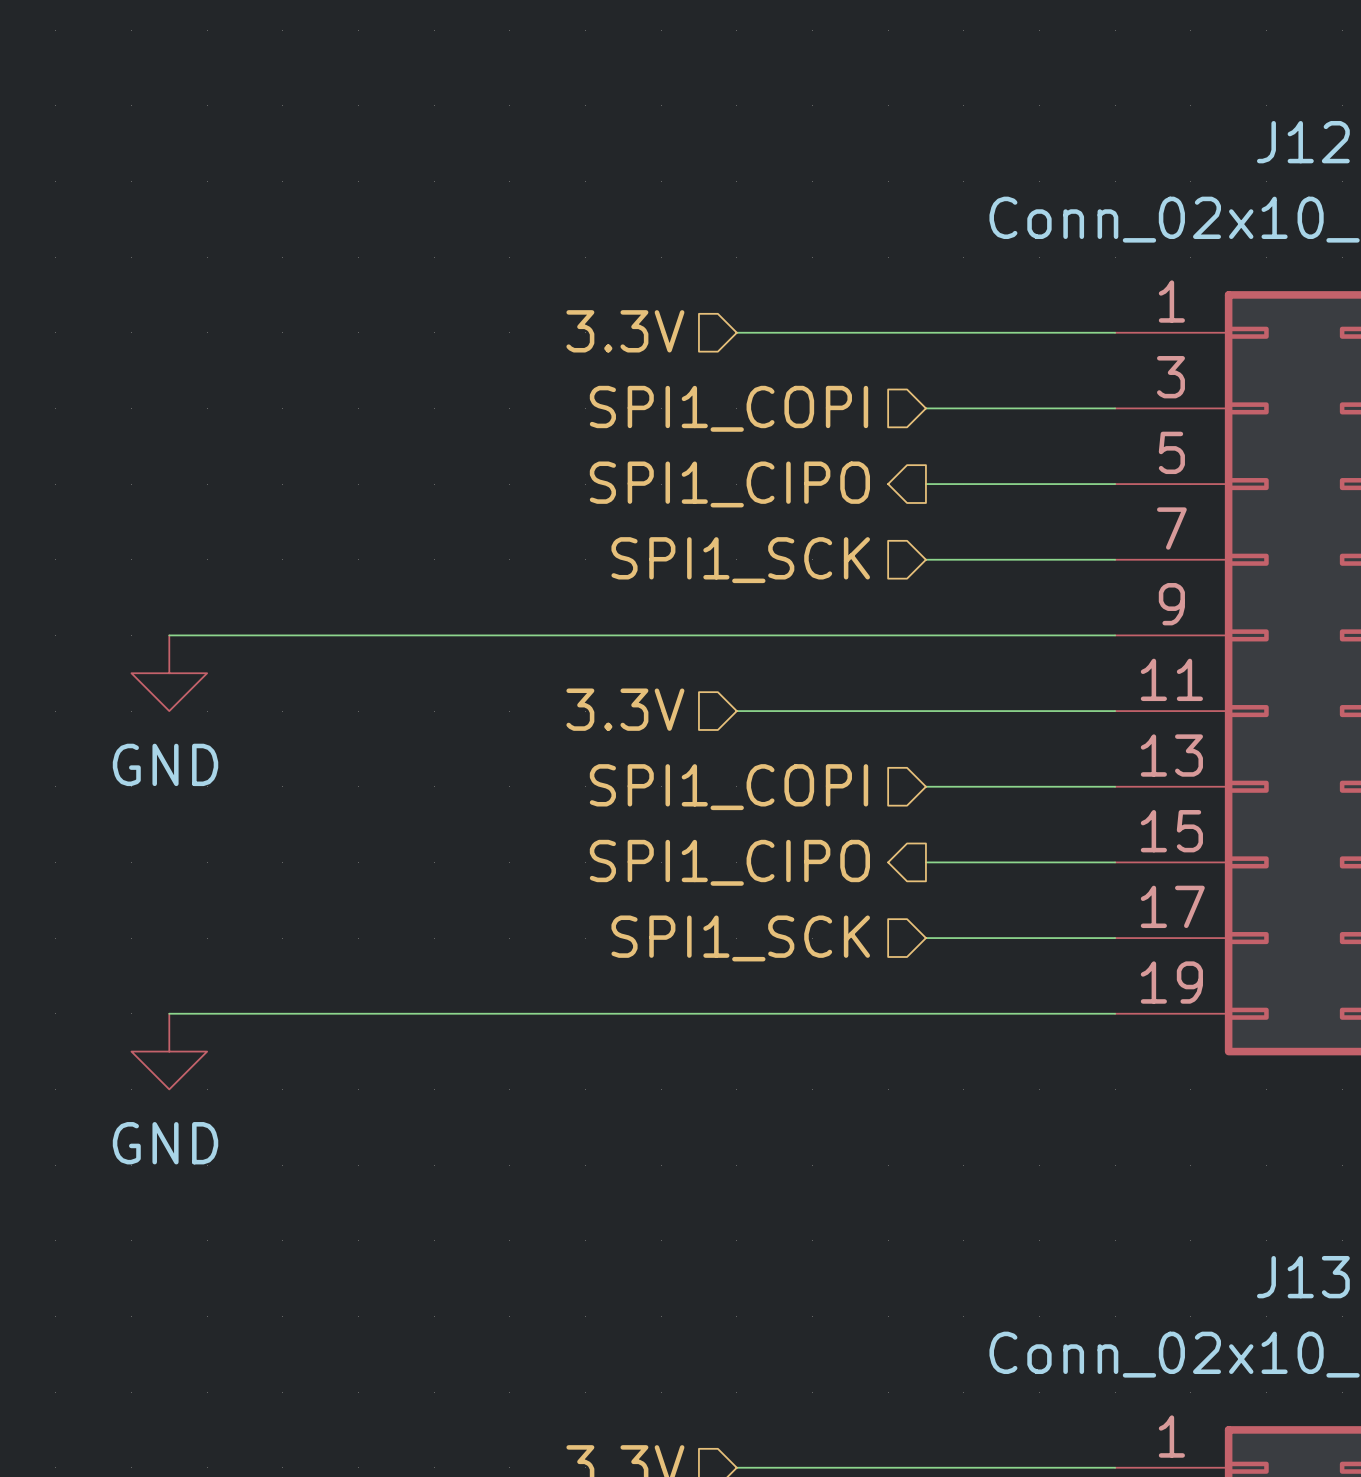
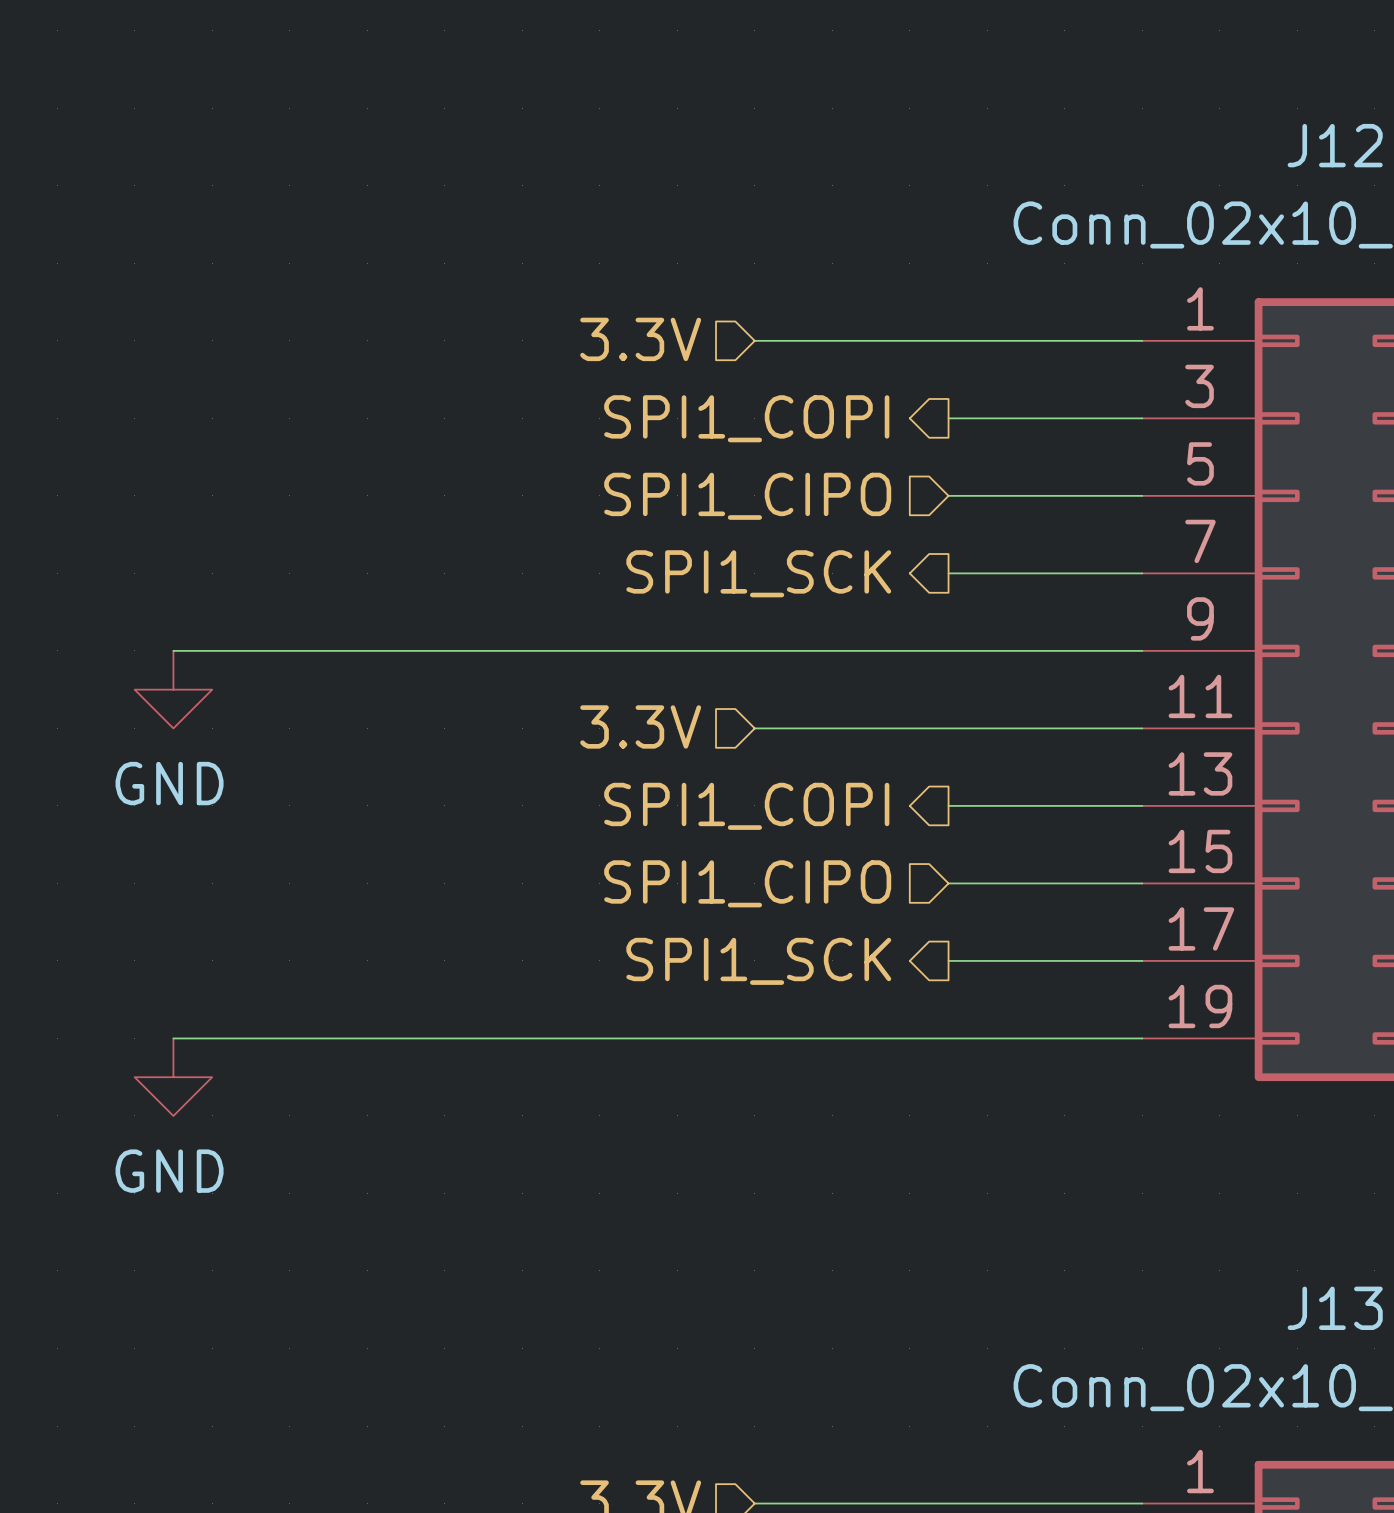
hierarchical label shape: input (729, 408) -> output (746, 418)
hierarchical label shape: output (729, 484) -> input (747, 496)
hierarchical label shape: input (740, 560) -> output (758, 573)
hierarchical label shape: input (729, 787) -> output (746, 806)
hierarchical label shape: output (729, 862) -> input (747, 883)
hierarchical label shape: input (740, 938) -> output (758, 961)

